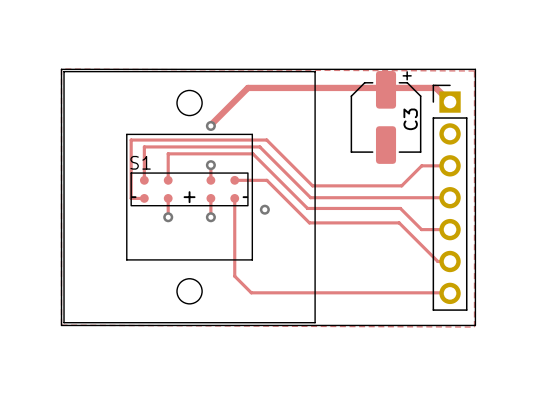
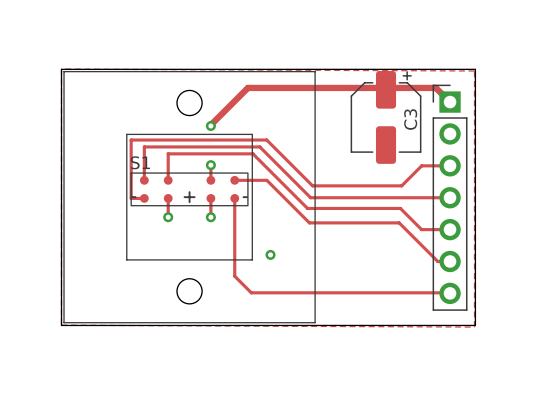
via position: (264, 209) -> (270, 254)

